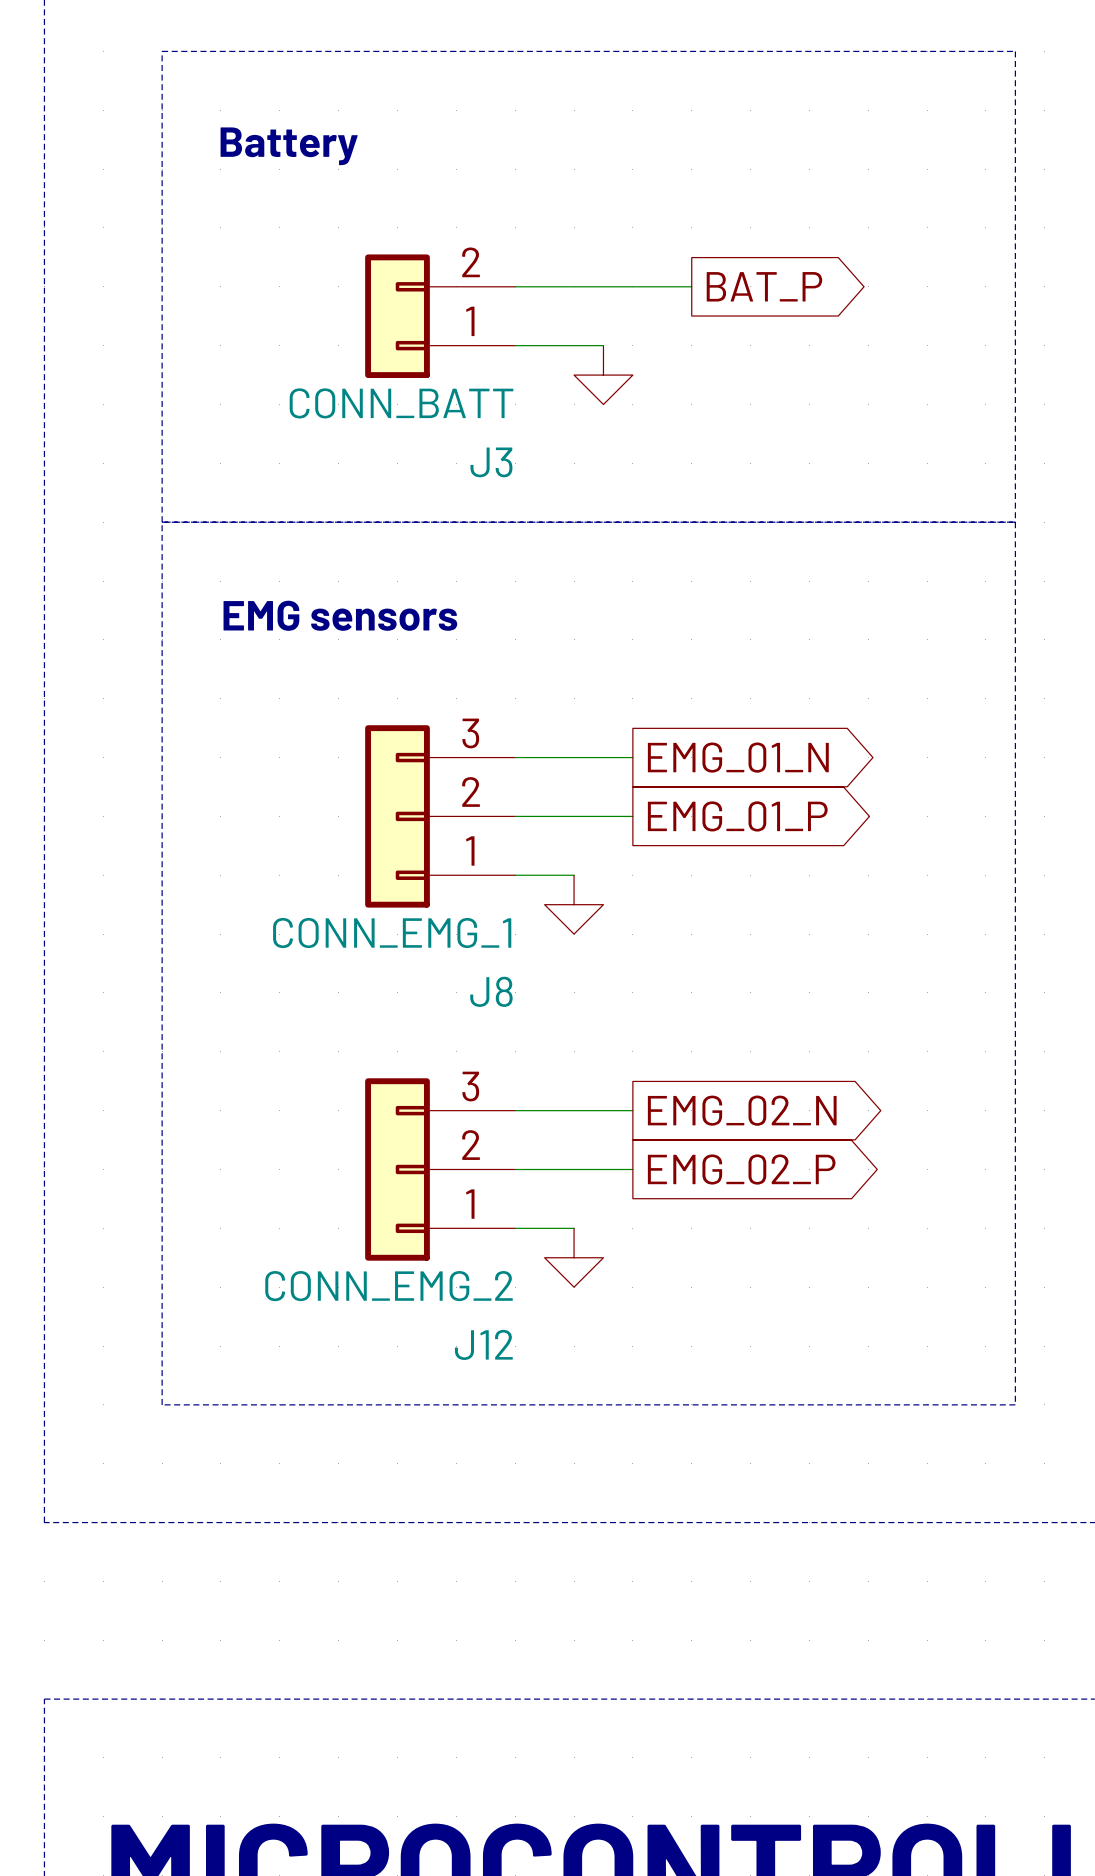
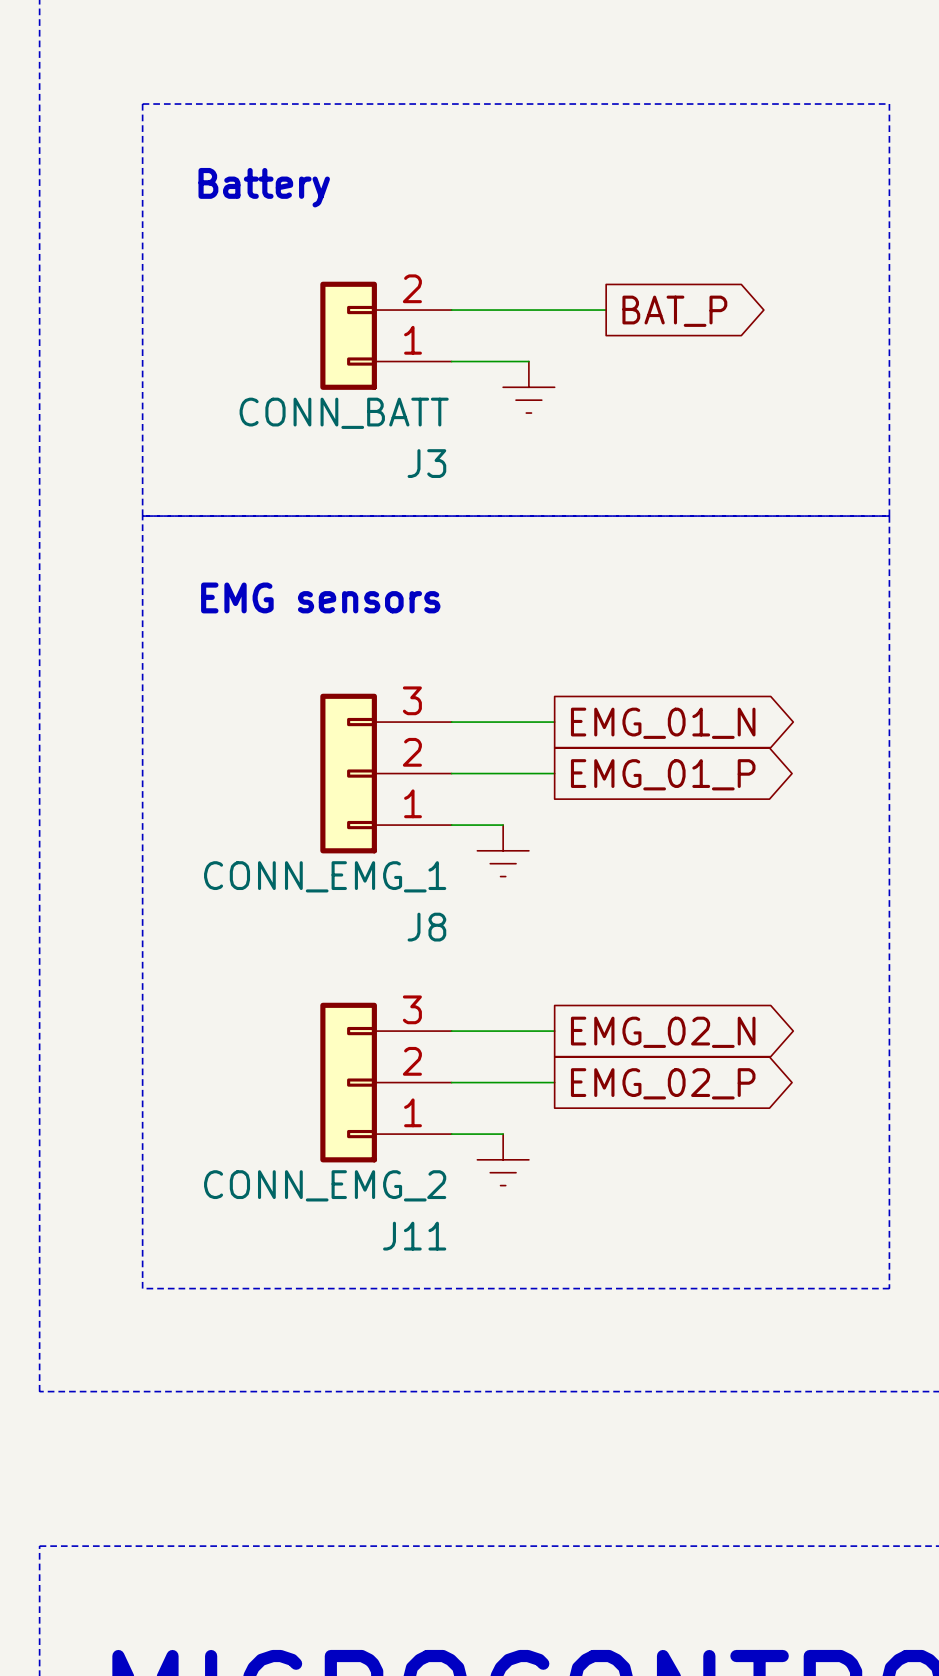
power symbol shape: [574, 345, 633, 405] -> [503, 361, 555, 414]
power symbol shape: [544, 875, 604, 935] -> [477, 825, 529, 877]
power symbol shape: [544, 1228, 604, 1288] -> [477, 1134, 529, 1186]
J12 name: J12 (483, 1344) -> J11 (414, 1236)

